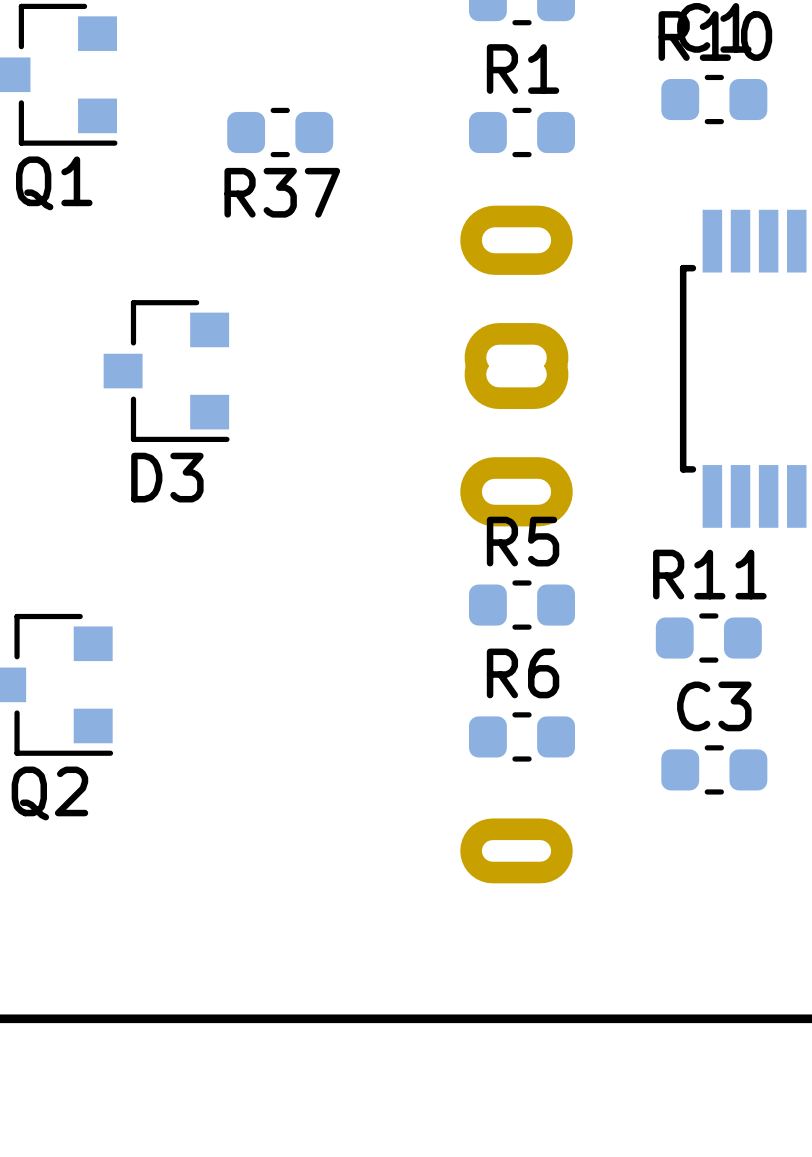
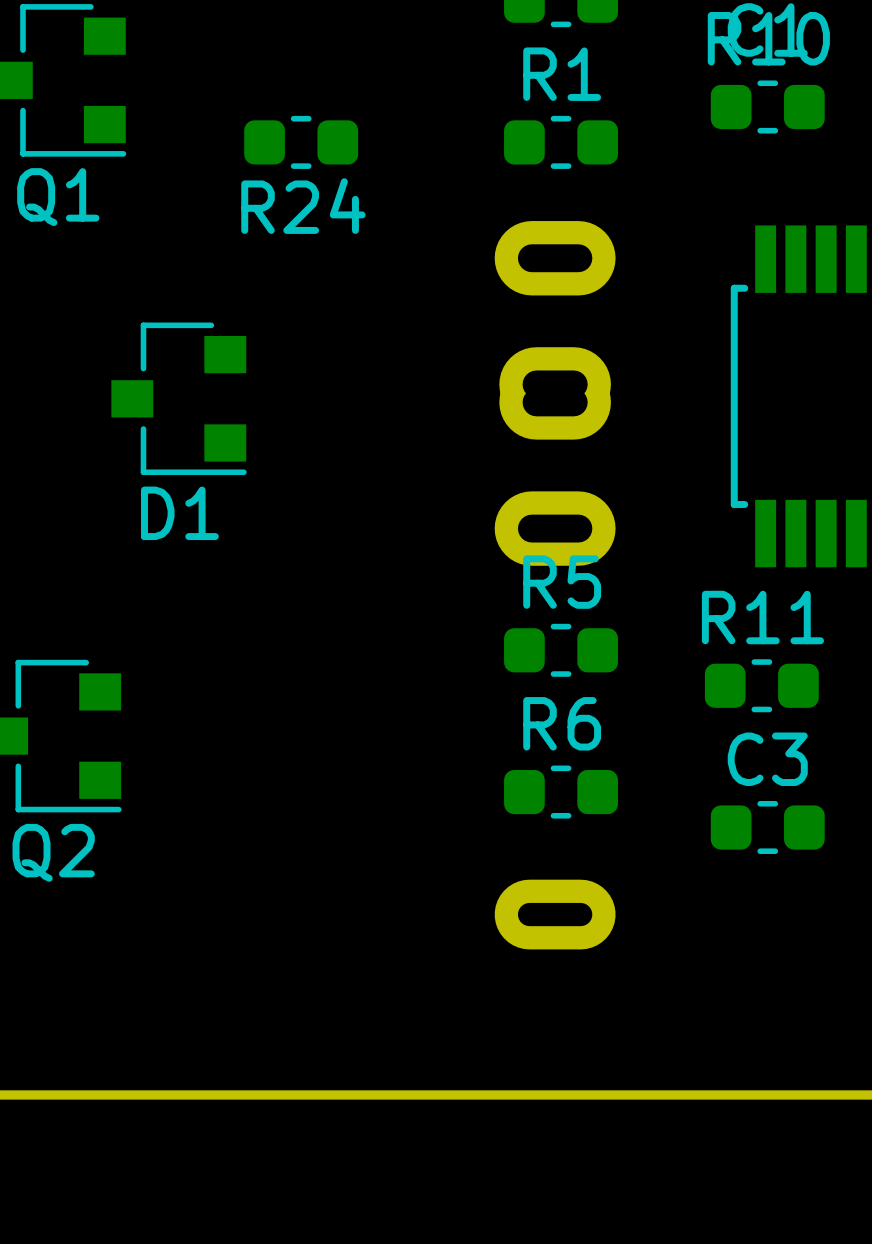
R37 name: R37 (282, 192) -> R24 (303, 206)
D3 name: D3 (167, 477) -> D1 (179, 513)

